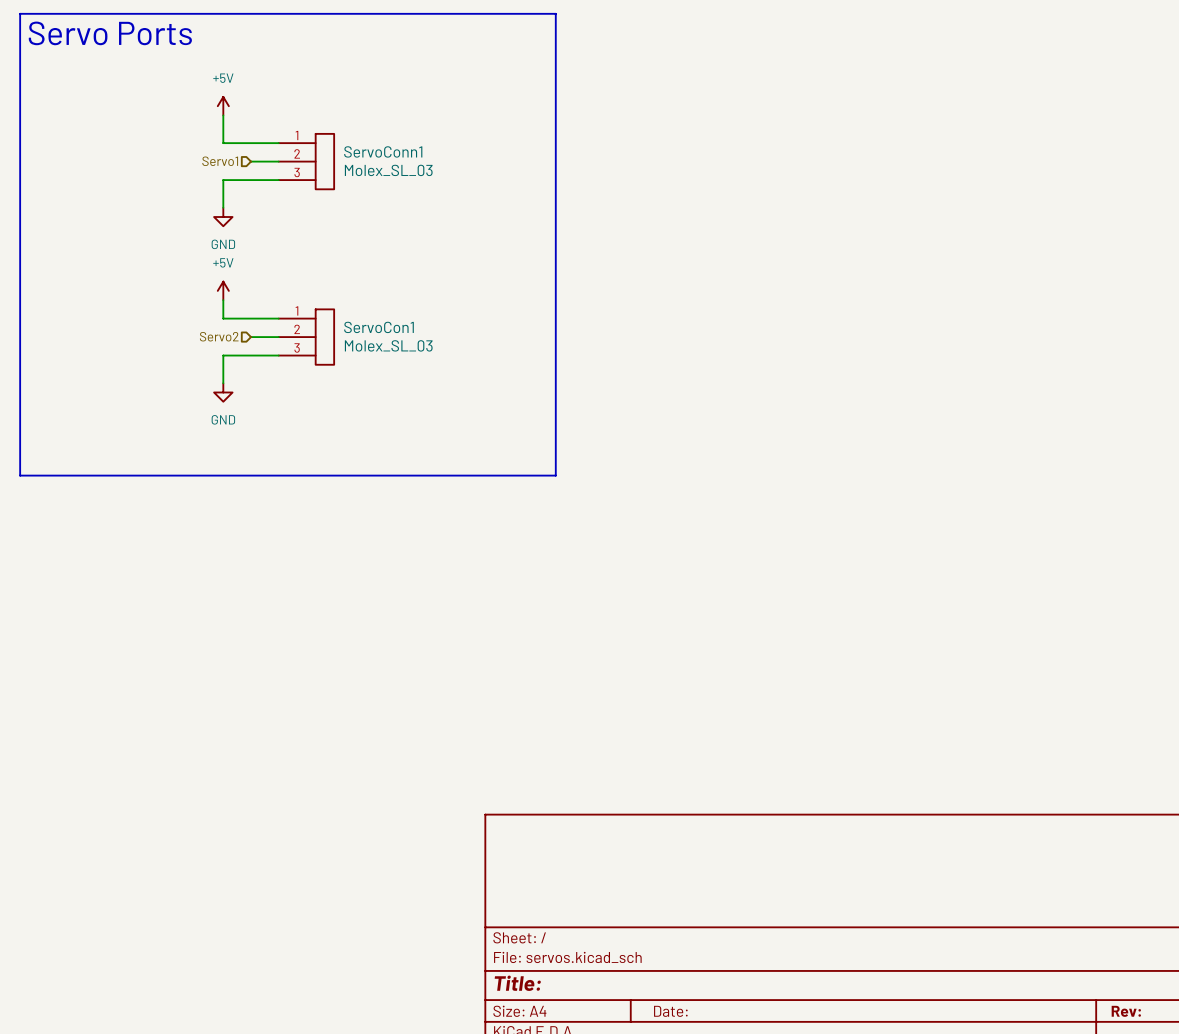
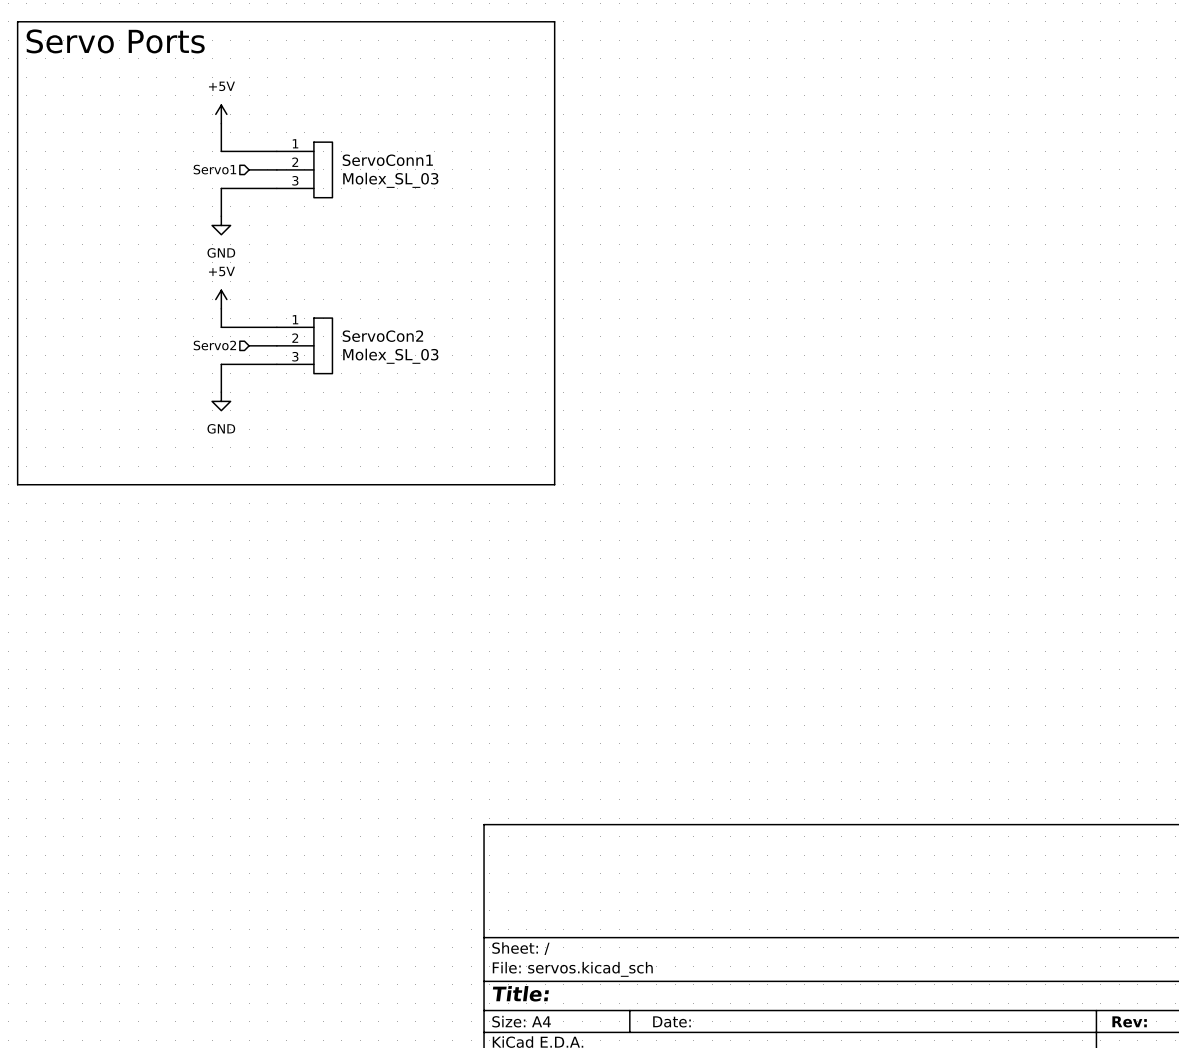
ServoCon1 name: ServoCon1 (379, 327) -> ServoCon2 (382, 336)

